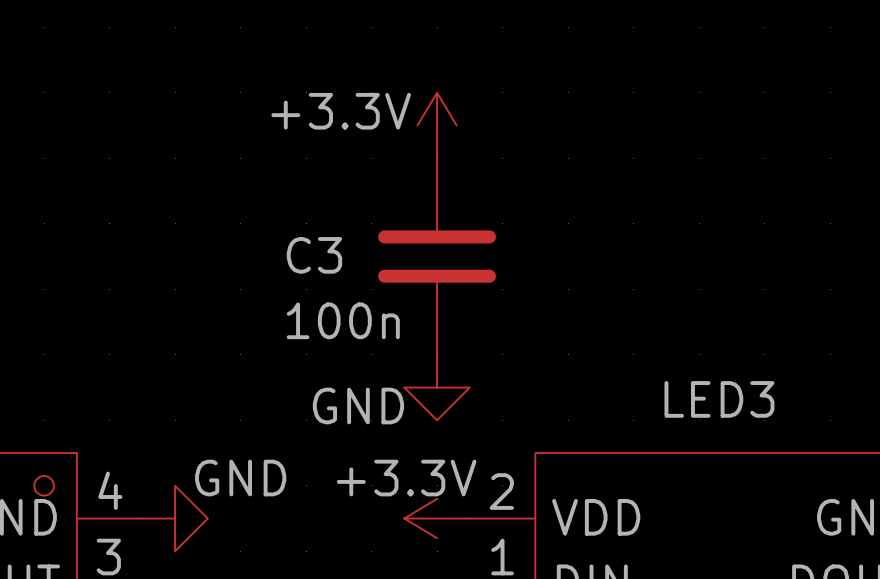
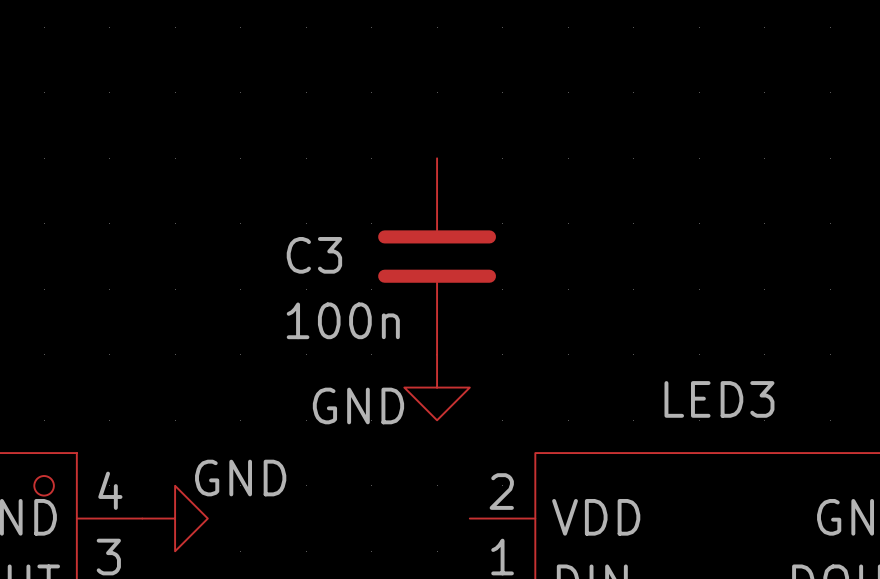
power symbol: +3.3V (437, 125) -> none
power symbol: +3.3V (437, 518) -> none

